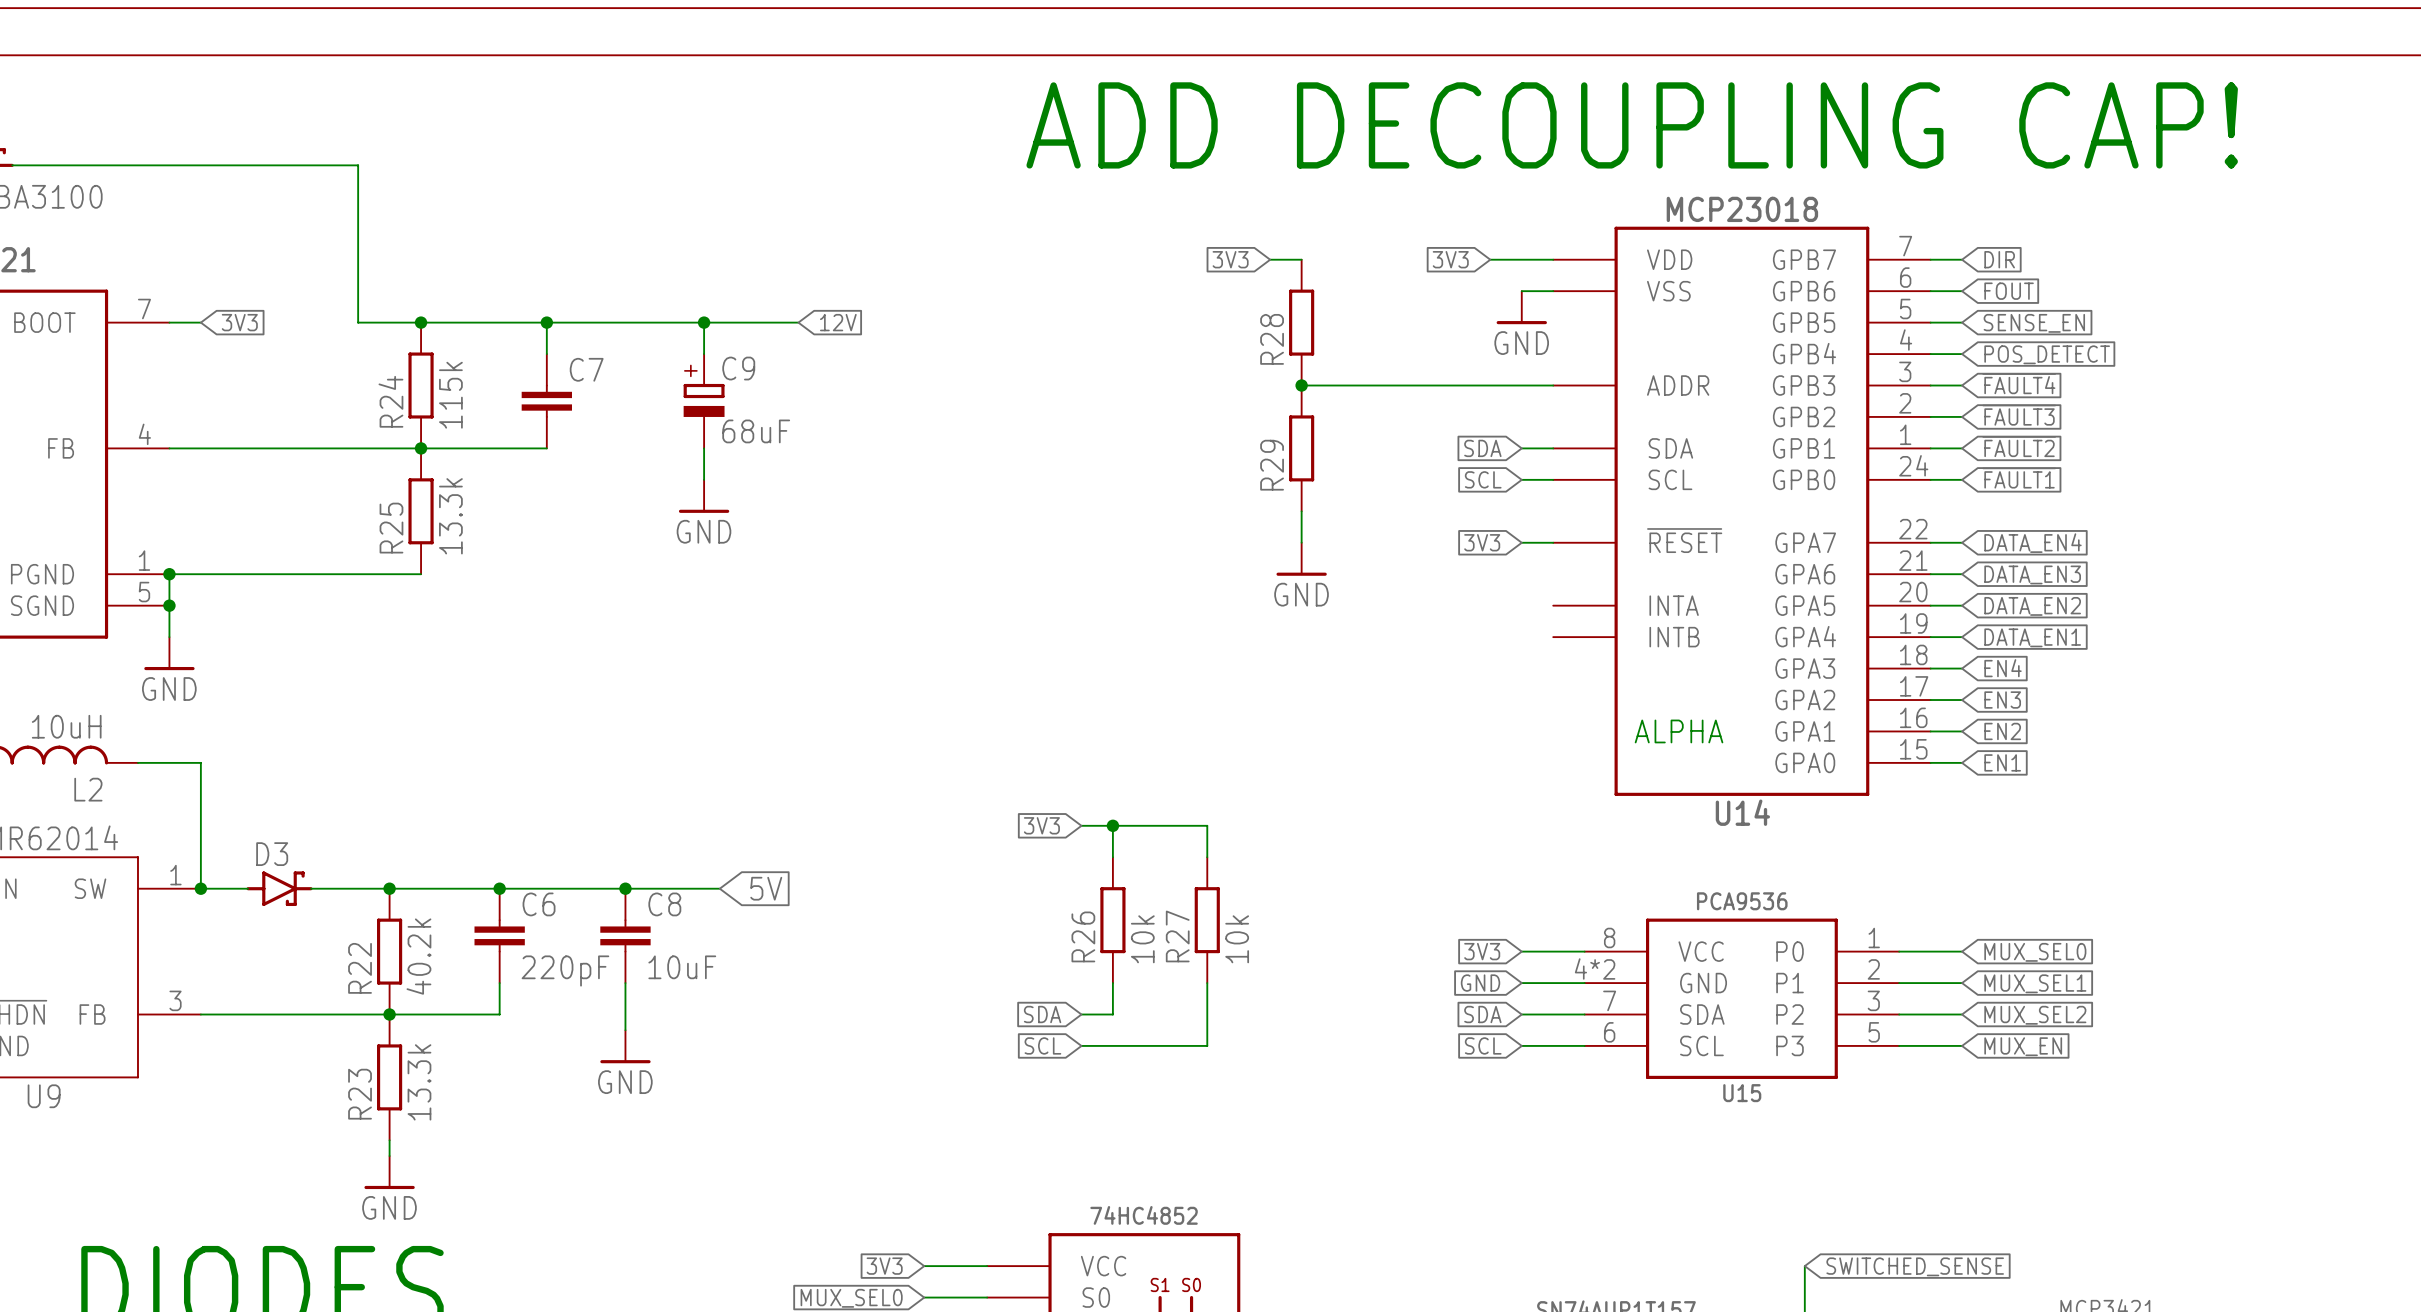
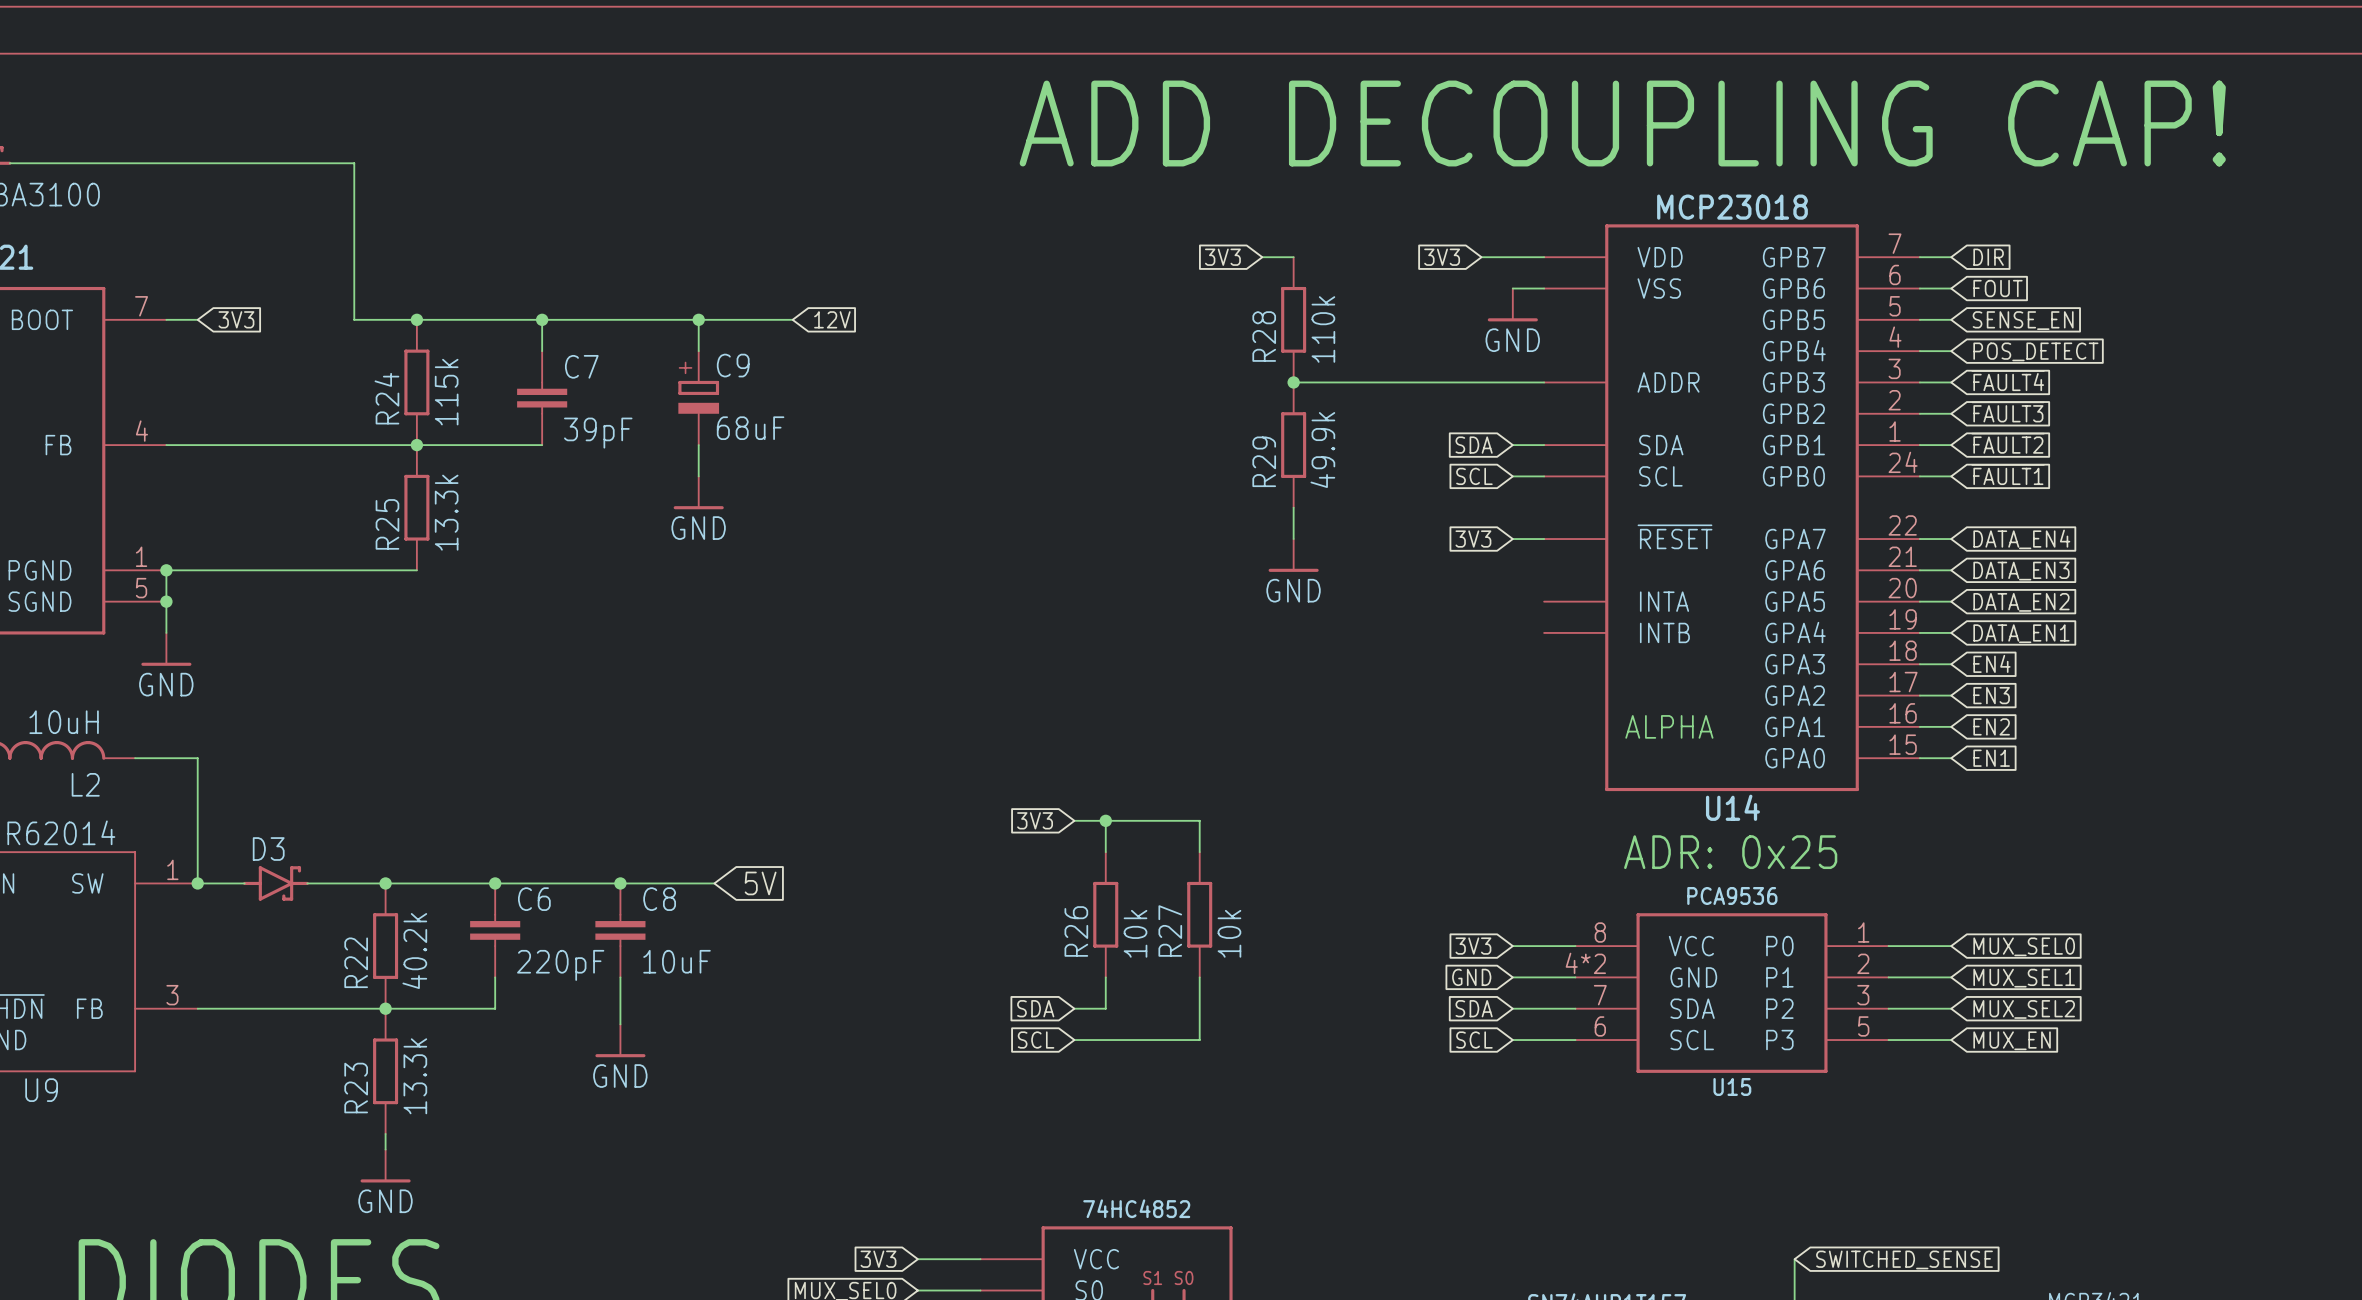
R28 value: none -> 110k (1323, 329)
C7 value: none -> 39pF (598, 433)
R29 value: none -> 49.9k (1322, 450)
text: none -> ADR: 0x25 (1730, 852)

